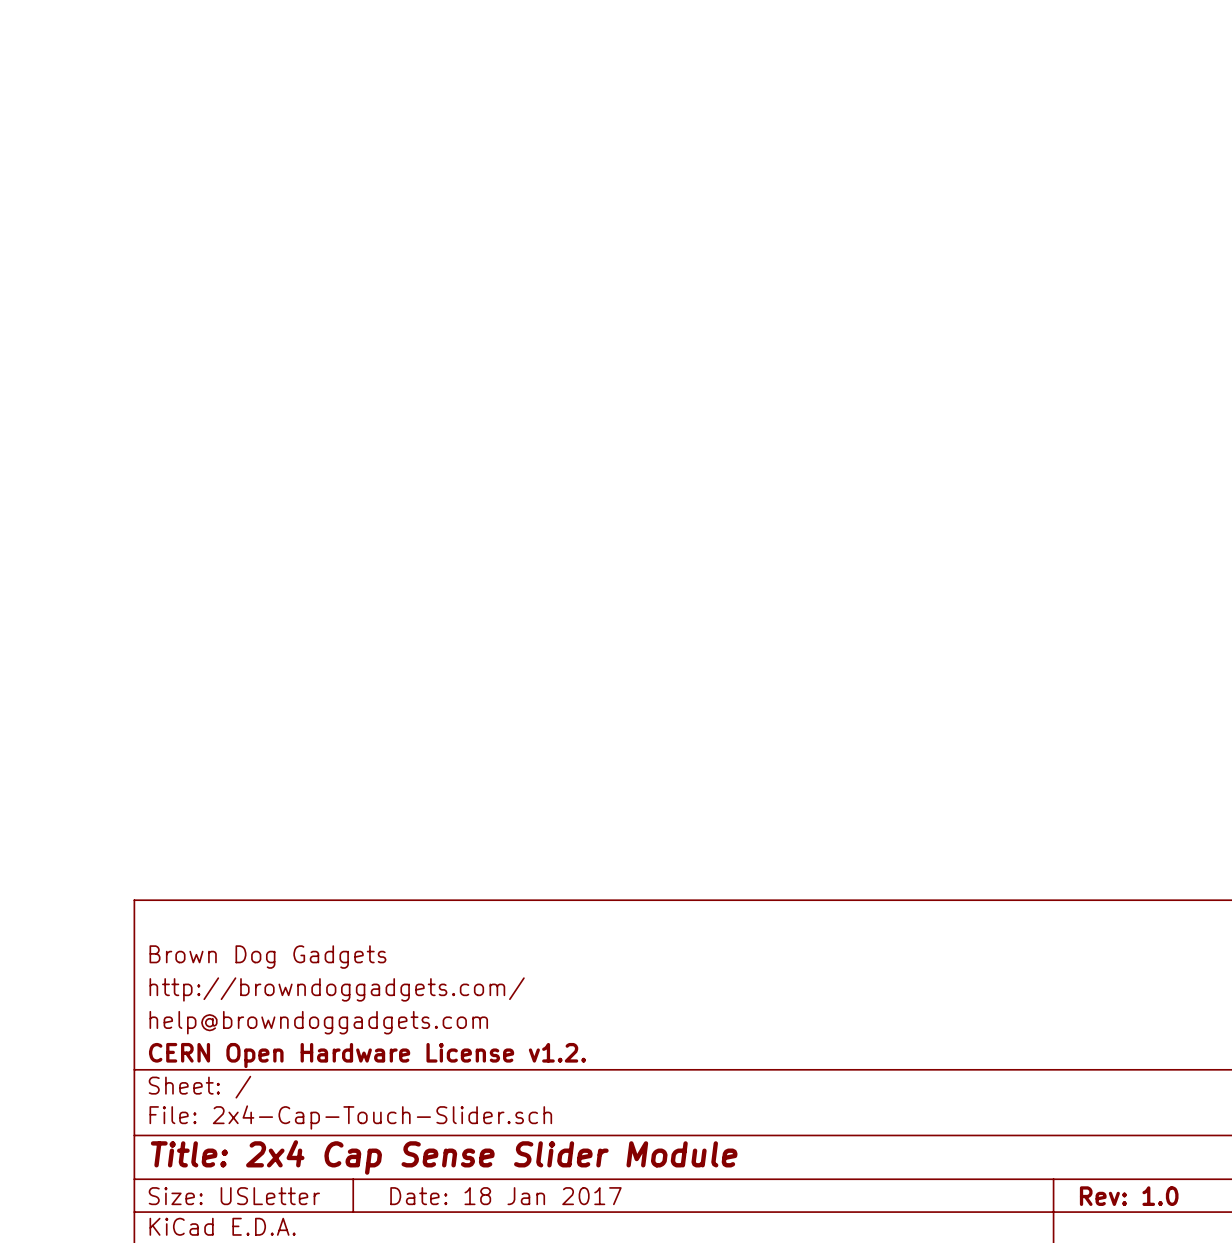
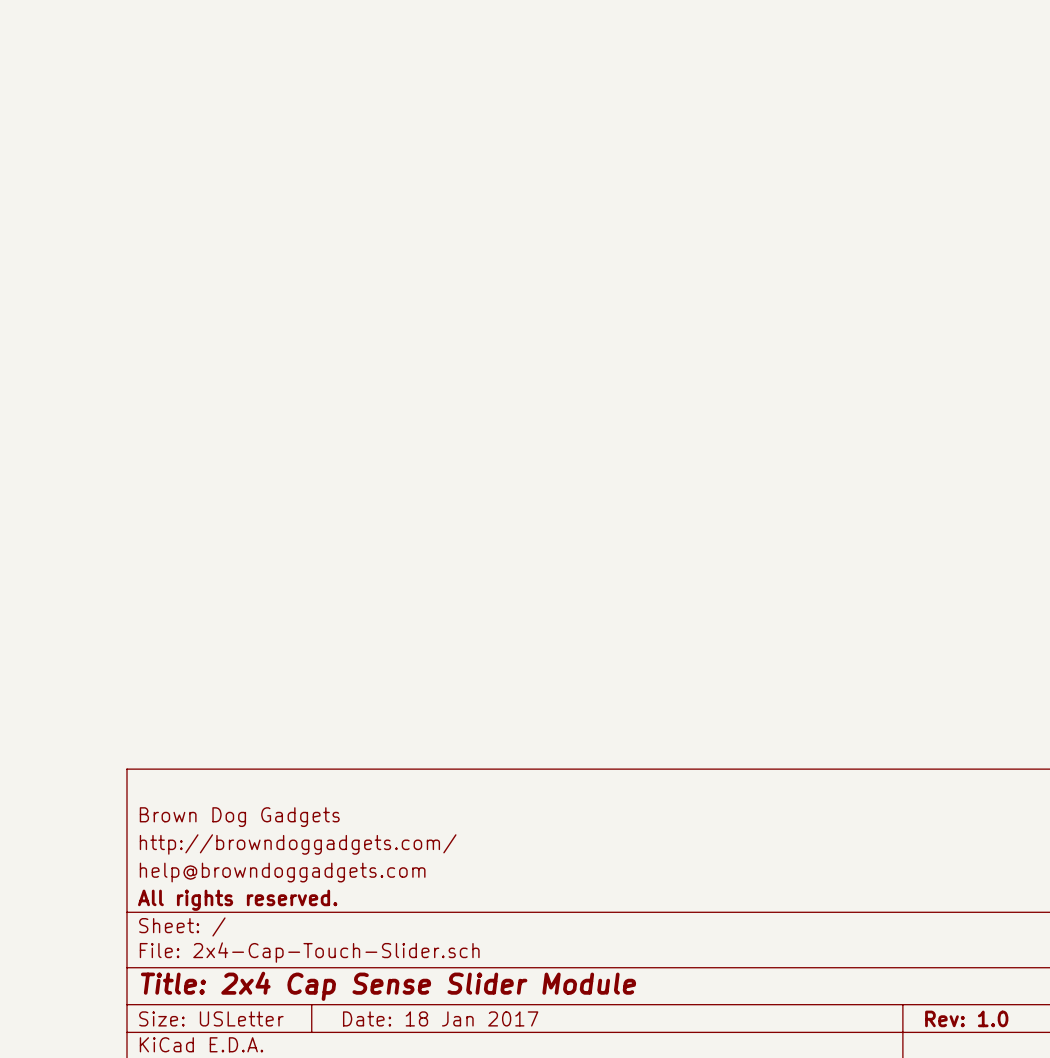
title block: CERN Open Hardware License v1.2. (367, 1055) -> All rights reserved. (237, 900)

